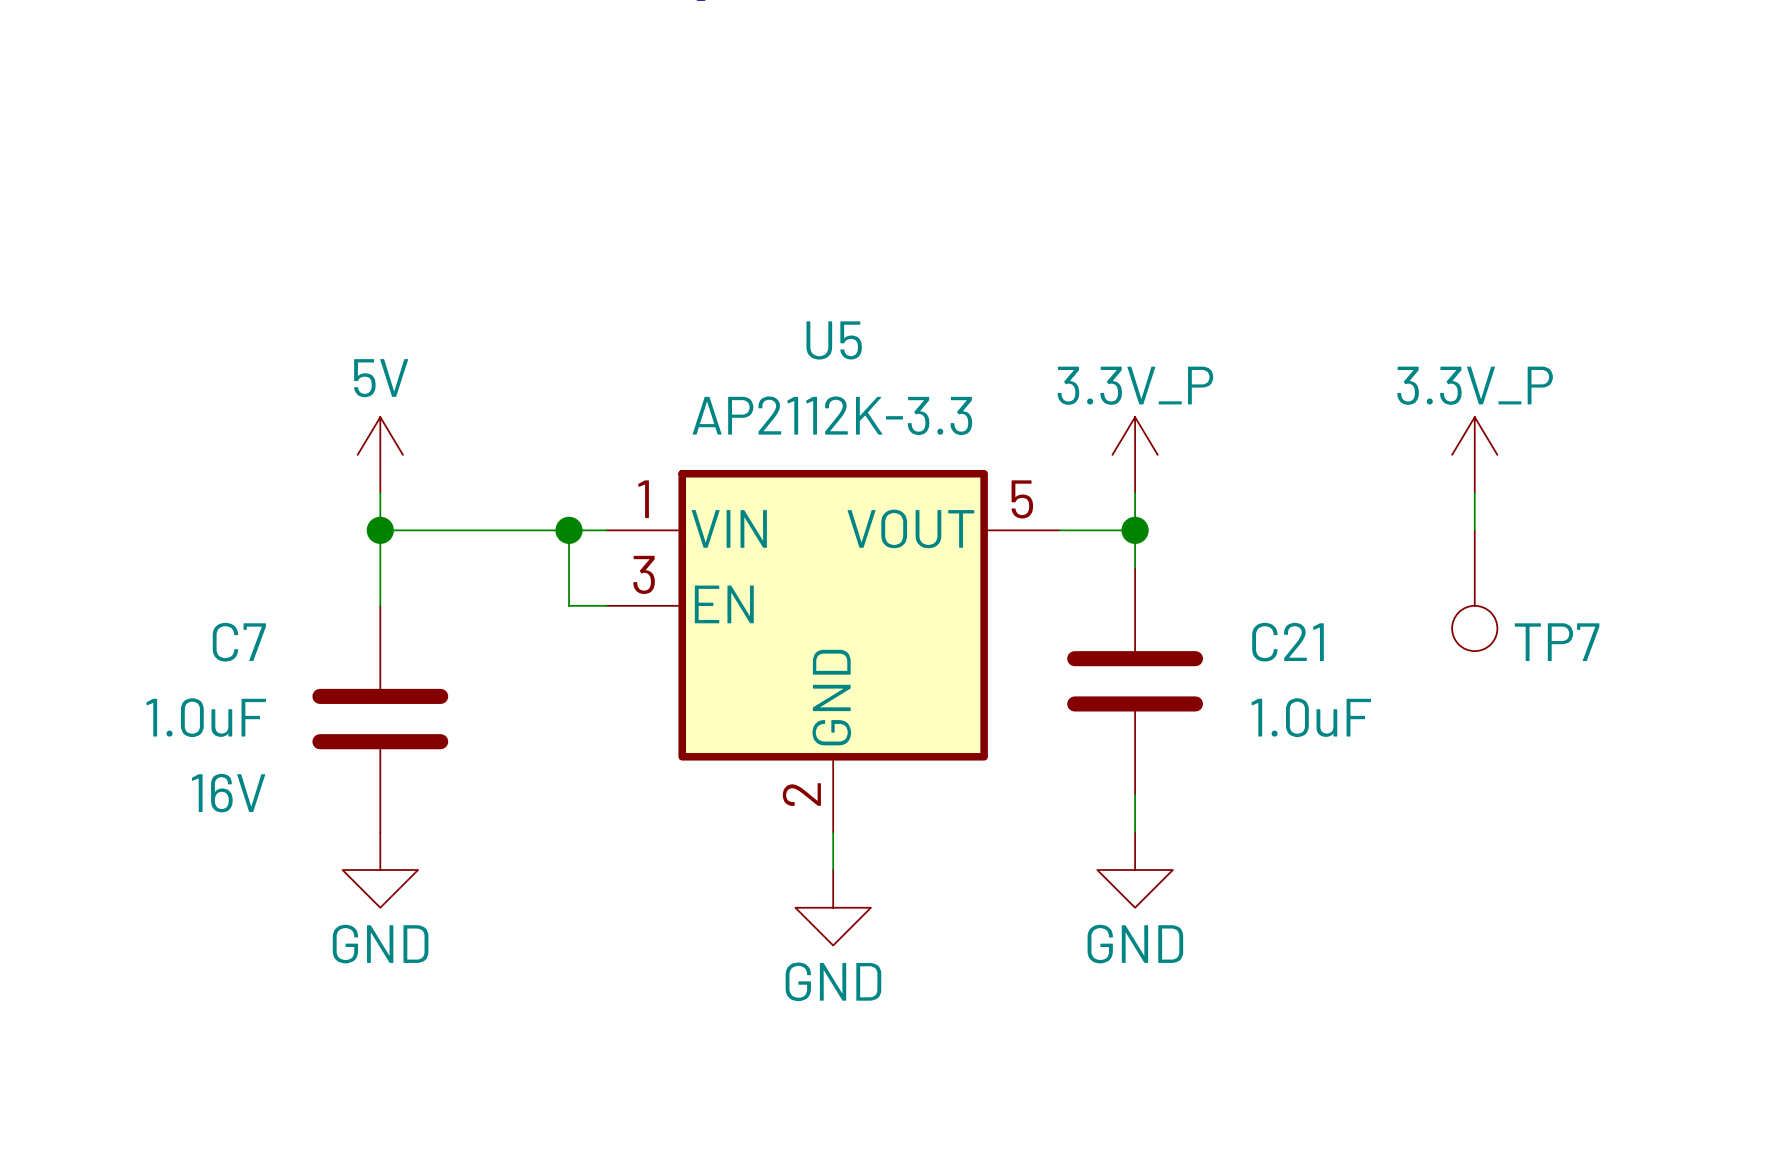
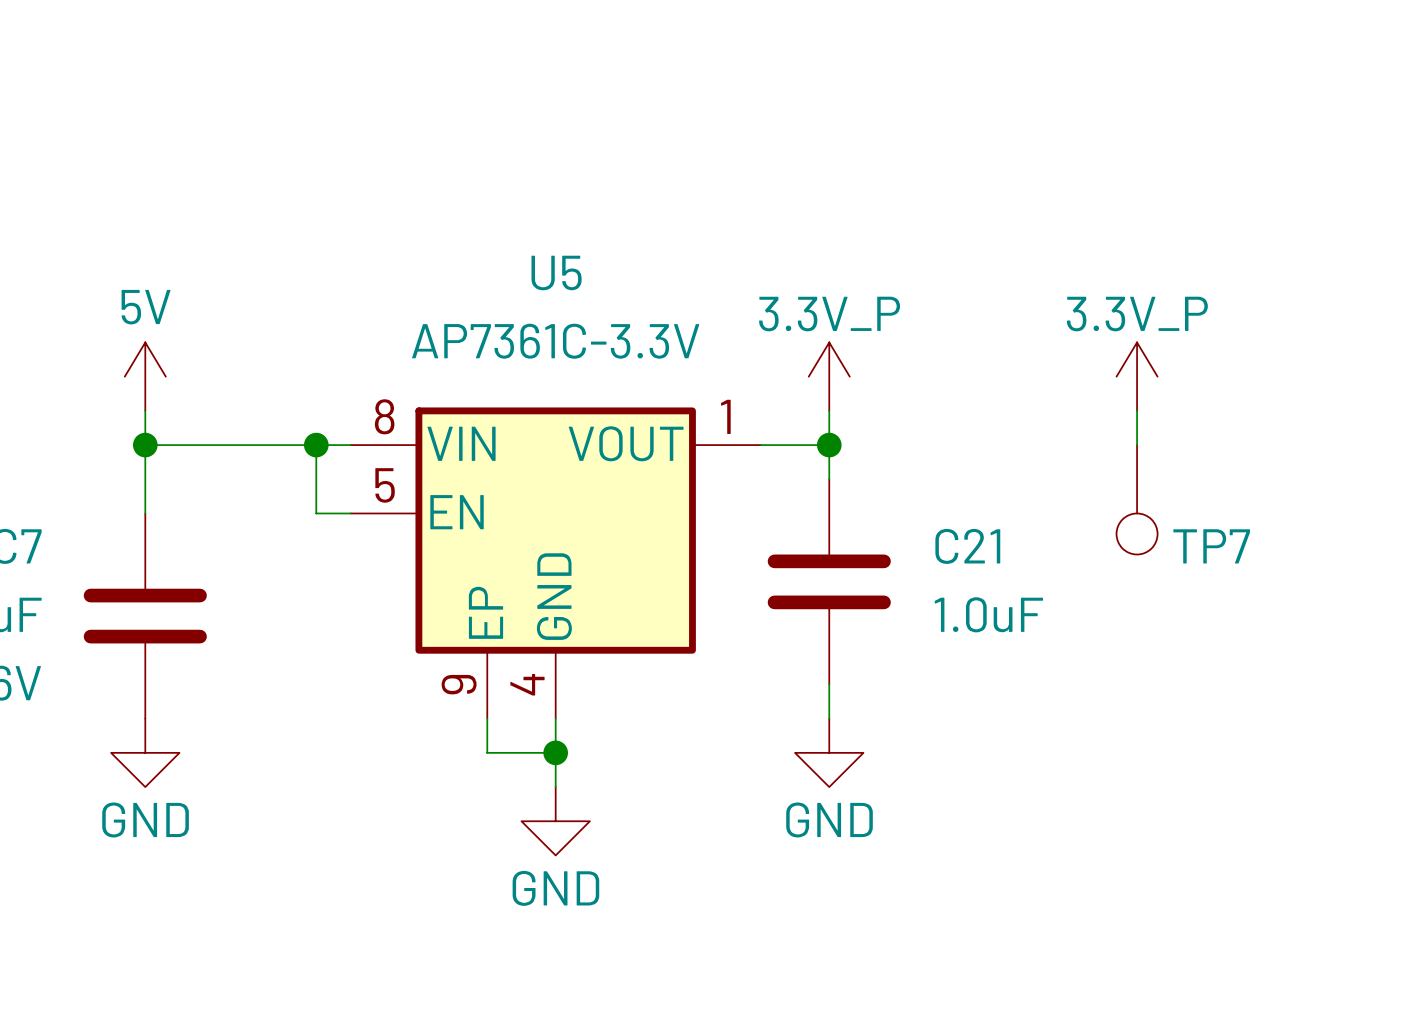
U5 value: AP2112K-3.3 (832, 415) -> AP7361C-3.3V (555, 341)
U5 symbol: [606, 469, 1060, 833] -> [350, 407, 761, 719]
wire: none -> (487, 718) (487, 752) (555, 752) (555, 787)
junction: none -> (555, 752)
power symbol position: GND (833, 907) -> GND (555, 821)

